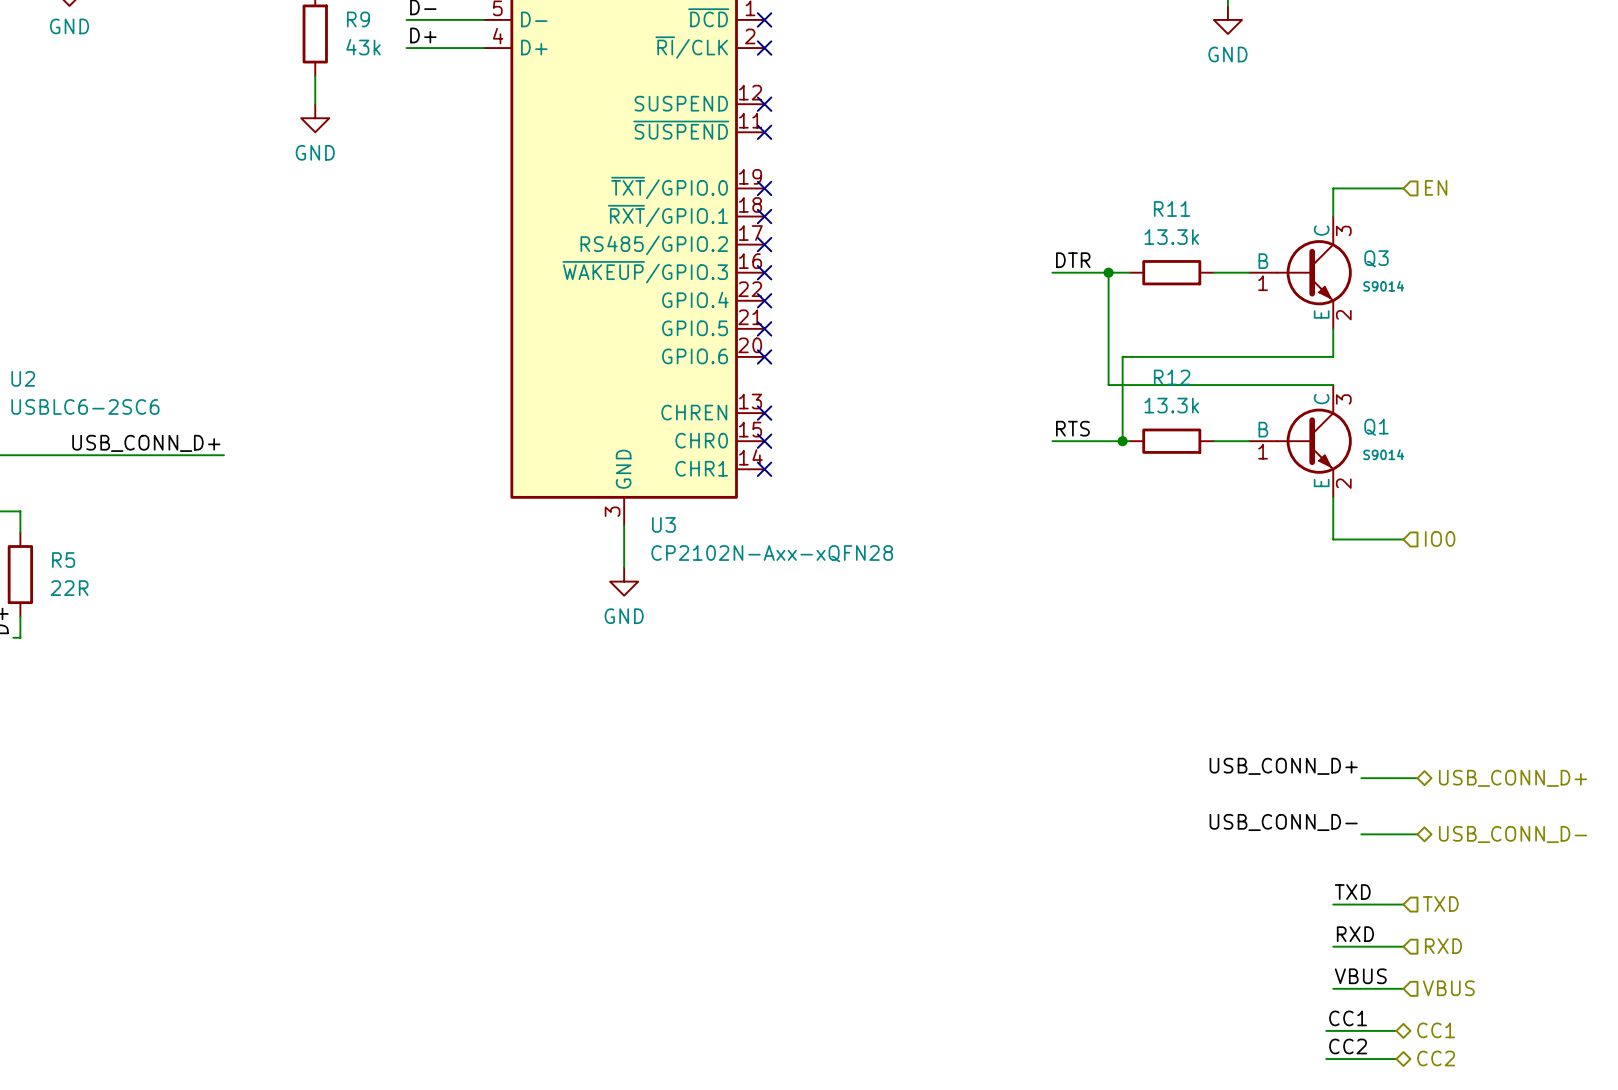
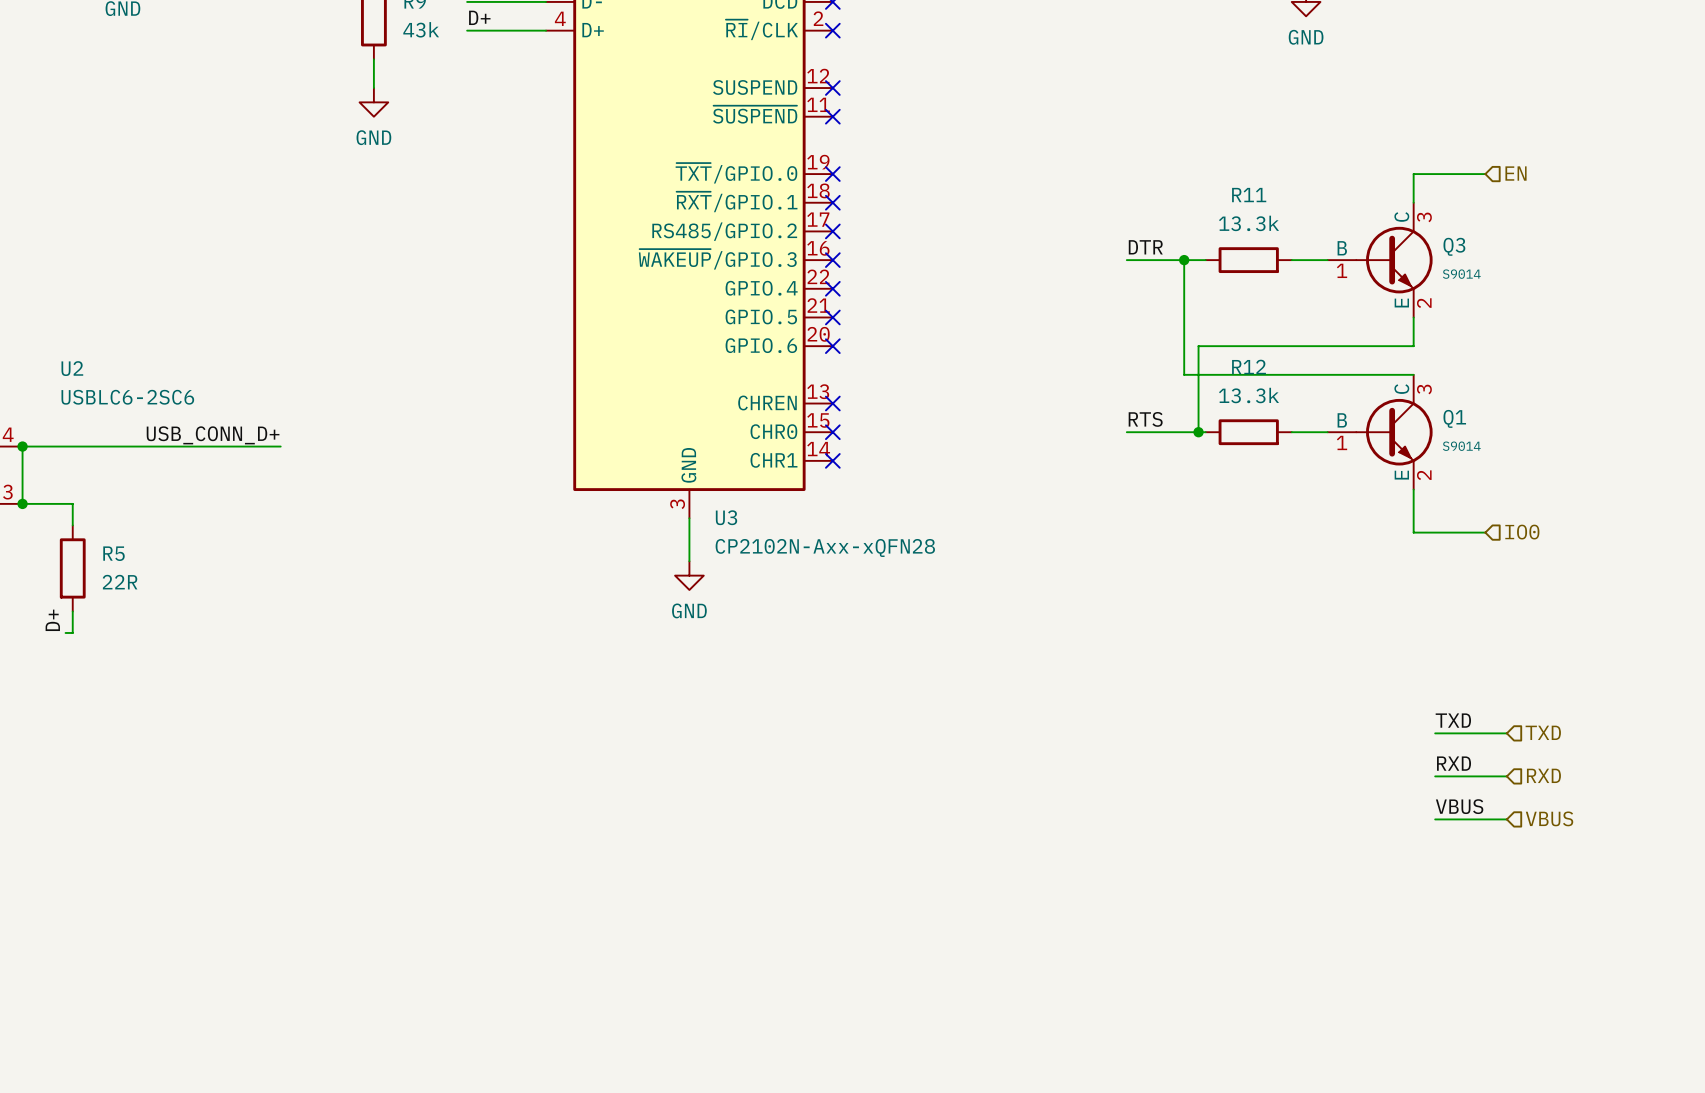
label: USB_CONN_D+ (1283, 766) -> none
wire: none -> (1435, 776) (1442, 776)
wire: none -> (1499, 776) (1506, 776)
hierarchical label: USB_CONN_D+ (1513, 778) -> none
label: USB_CONN_D- (1283, 822) -> none
wire: (1361, 834) (1417, 834) -> none
hierarchical label: USB_CONN_D- (1513, 834) -> none
label position: TXD (1352, 892) -> TXD (1453, 720)
wire: (1333, 904) (1403, 904) -> (1435, 733) (1506, 733)
hierarchical label position: TXD (1440, 904) -> TXD (1543, 732)
label position: RXD (1355, 934) -> RXD (1454, 763)
wire: (1333, 946) (1403, 946) -> none
hierarchical label position: RXD (1443, 946) -> RXD (1543, 775)
label position: VBUS (1360, 976) -> VBUS (1459, 806)
wire: (1333, 988) (1403, 988) -> (1435, 819) (1506, 819)
hierarchical label position: VBUS (1448, 988) -> VBUS (1549, 818)
label: CC1 (1348, 1018) -> none
wire: (1326, 1030) (1396, 1030) -> none
hierarchical label: CC1 (1436, 1030) -> none
label: CC2 (1348, 1046) -> none
hierarchical label: CC2 (1436, 1058) -> none
wire: (1326, 1059) (1396, 1059) -> none

